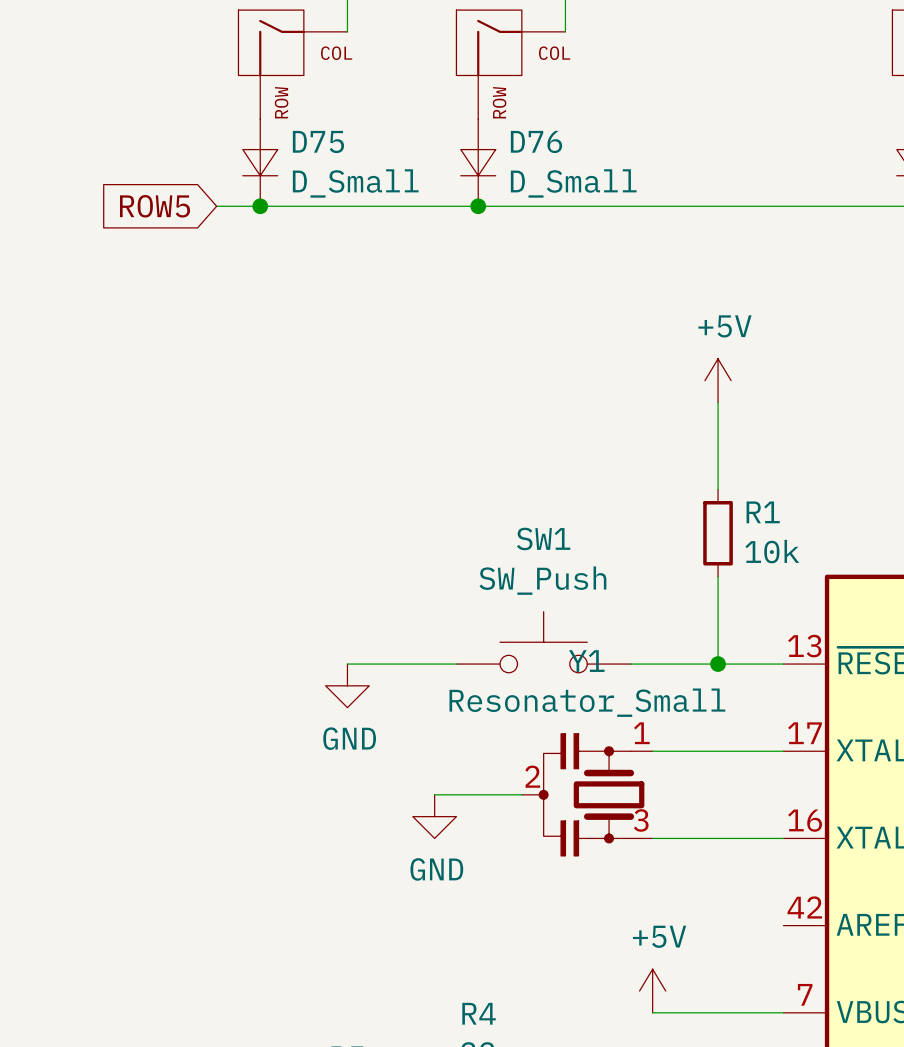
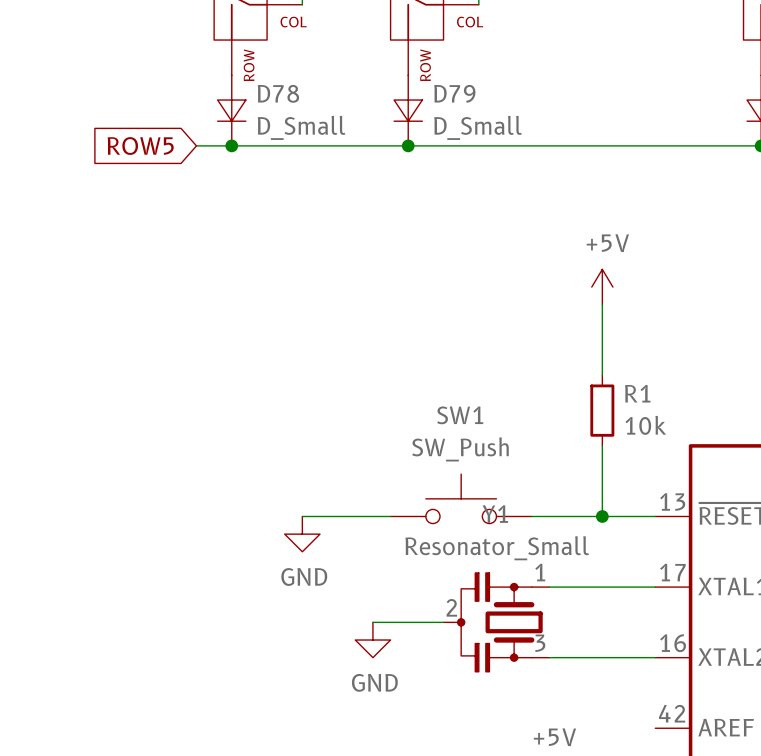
D75 name: D75 (318, 141) -> D78 (278, 93)
D76 name: D76 (536, 141) -> D79 (454, 93)

